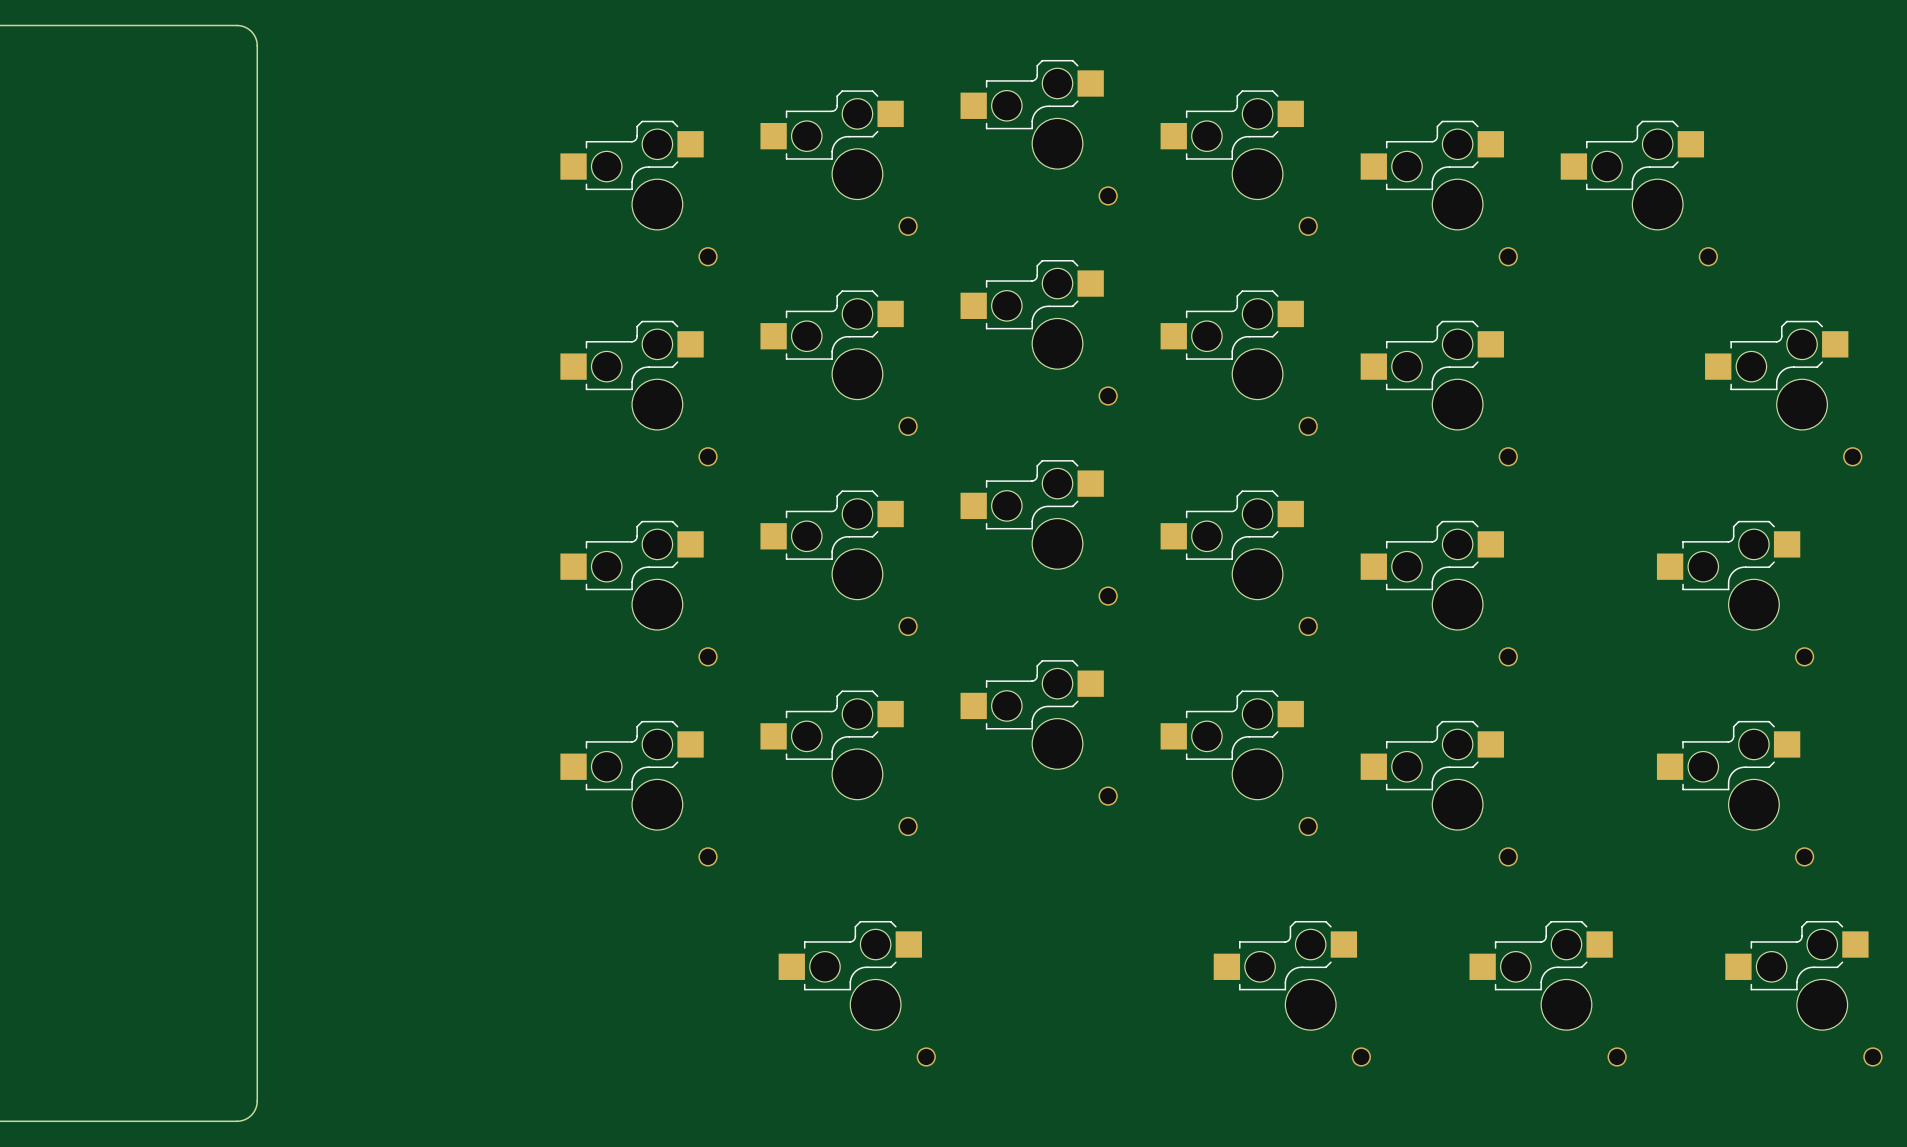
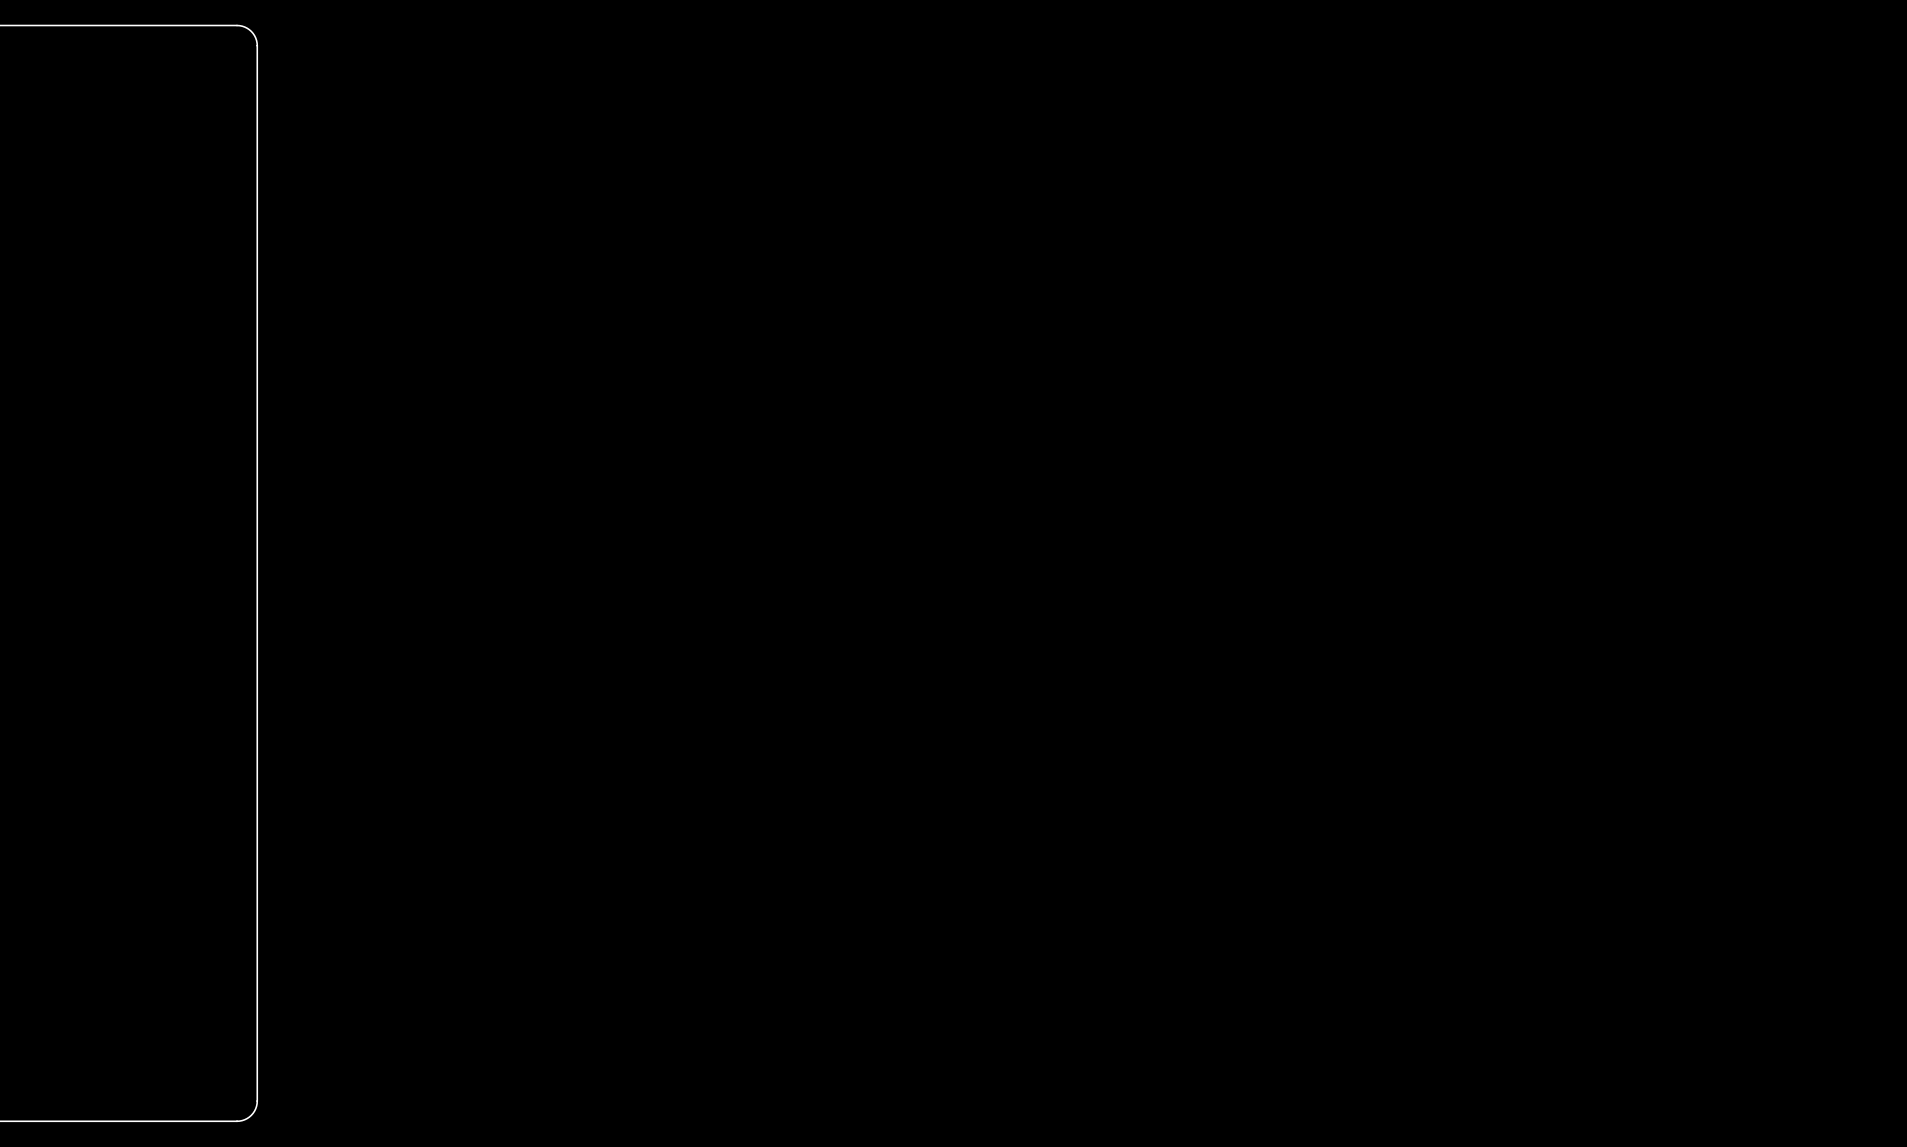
part: (1039, 132) -> none
part: (839, 163) -> none
part: (1239, 163) -> none
part: (639, 193) -> none
part: (1439, 193) -> none
part: (1639, 193) -> none
part: (1039, 332) -> none
part: (839, 363) -> none
part: (1239, 363) -> none
part: (639, 393) -> none
part: (1439, 393) -> none
part: (1783, 393) -> none
part: (1039, 532) -> none
part: (839, 563) -> none
part: (1239, 563) -> none
part: (639, 593) -> none
part: (1439, 593) -> none
part: (1735, 593) -> none
part: (1039, 732) -> none
part: (839, 763) -> none
part: (1239, 763) -> none
part: (639, 793) -> none
part: (1439, 793) -> none
part: (1735, 793) -> none
part: (857, 993) -> none
part: (1292, 993) -> none
part: (1548, 993) -> none
part: (1803, 993) -> none

